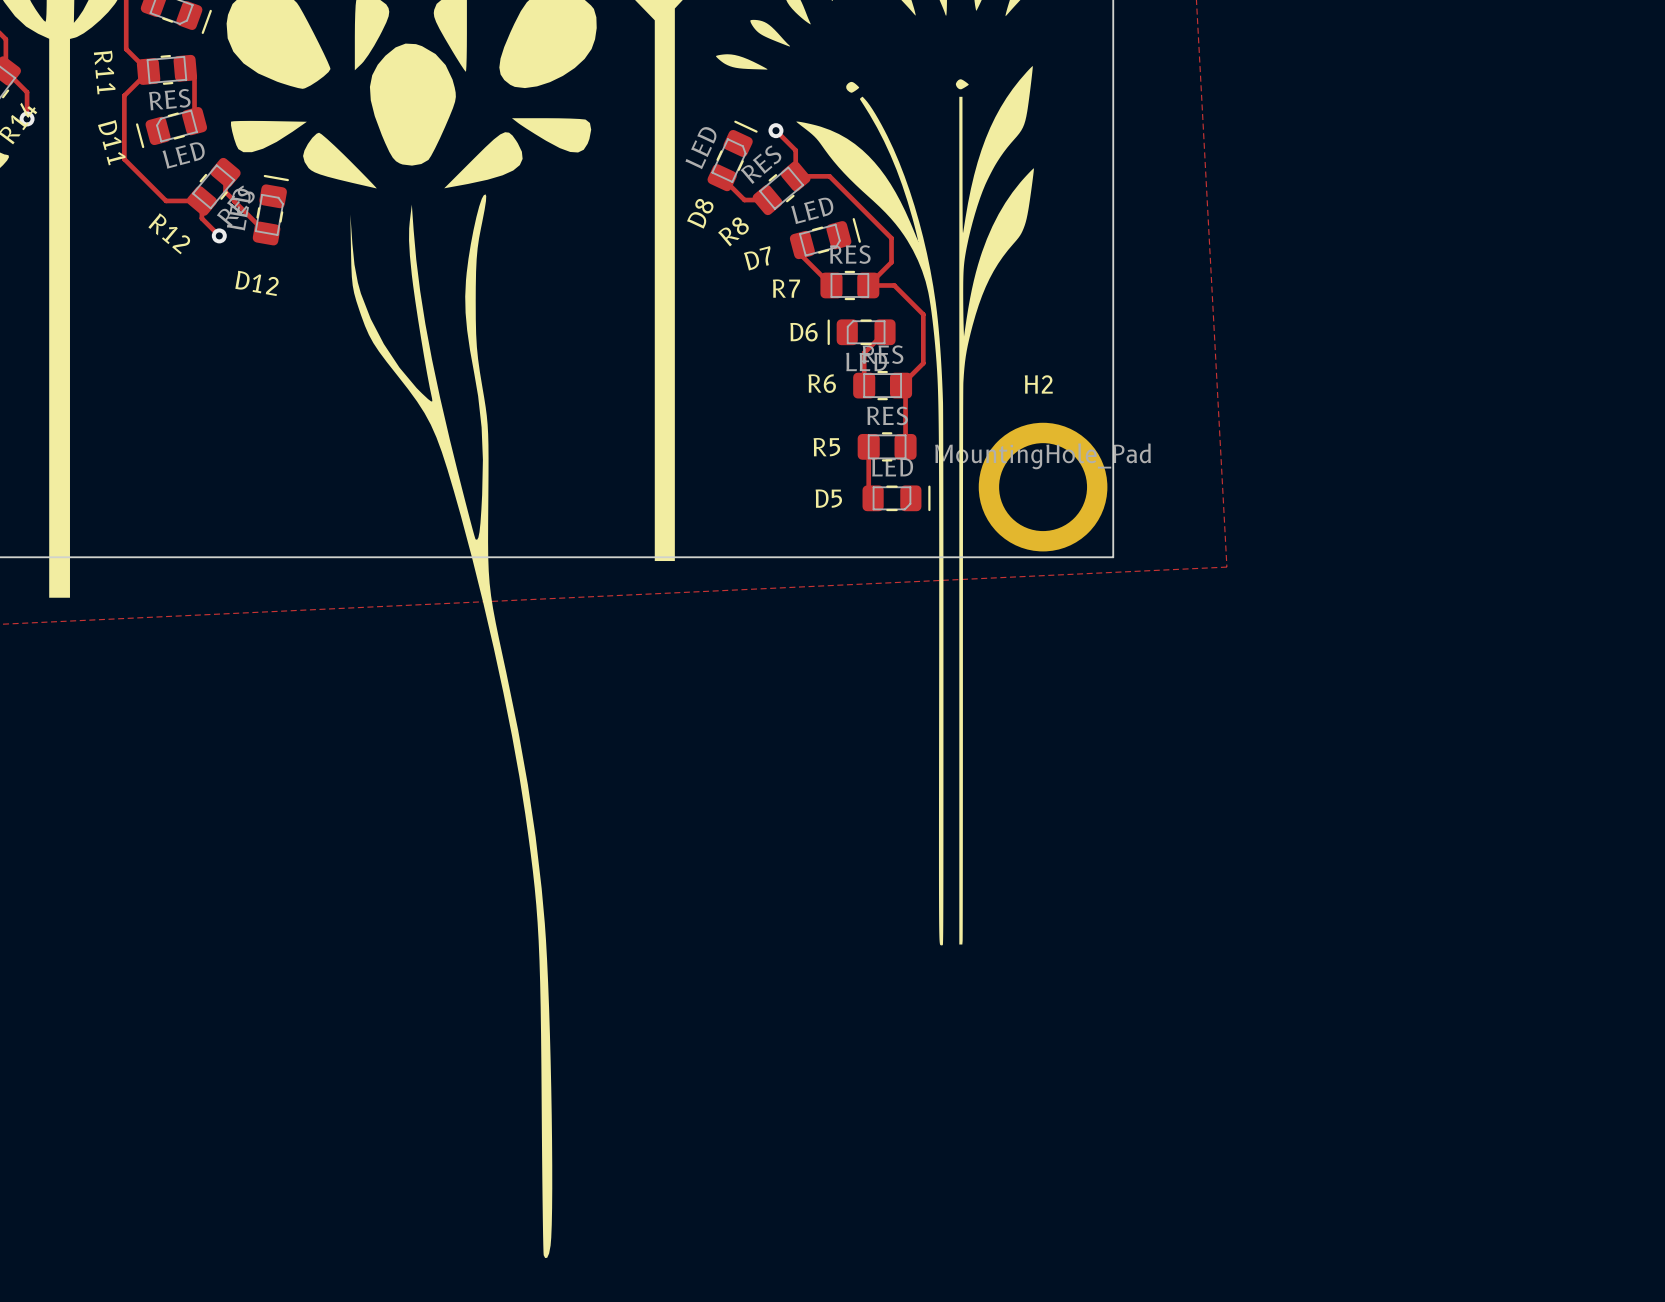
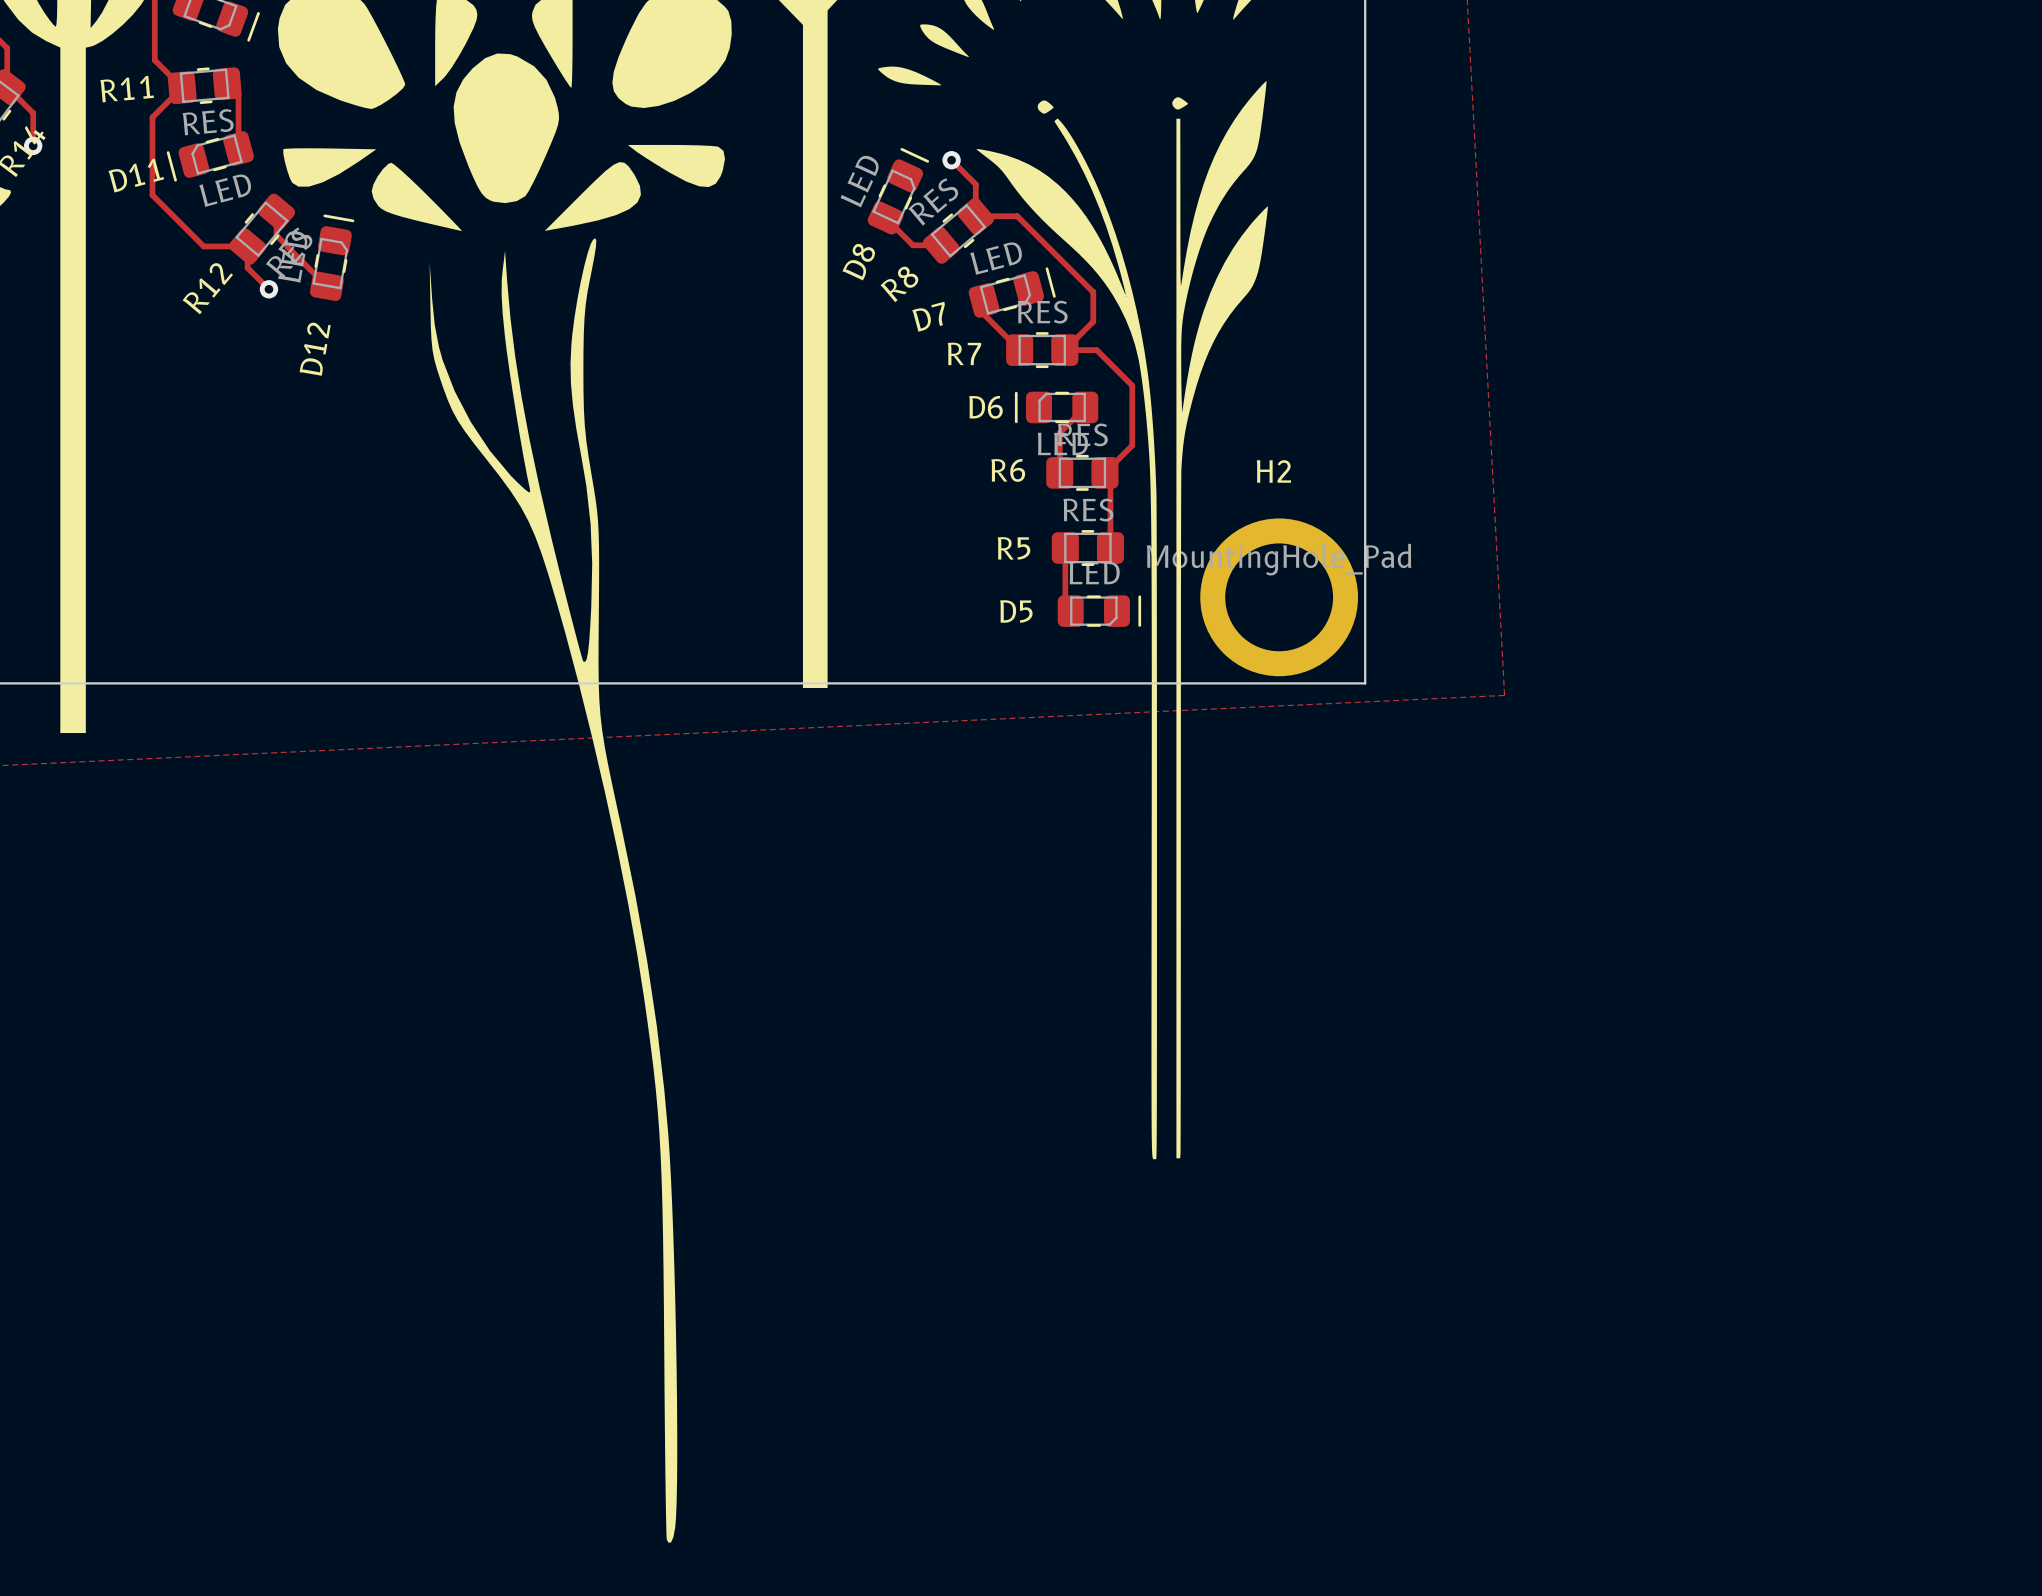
R11 name rotation: 0° (104, 72) -> 90° counterclockwise (127, 89)
D11 name rotation: 0° (111, 142) -> 90° counterclockwise (136, 175)
R12 name rotation: 0° (169, 233) -> 90° counterclockwise (207, 288)
D12 name rotation: 0° (257, 283) -> 90° counterclockwise (315, 349)

